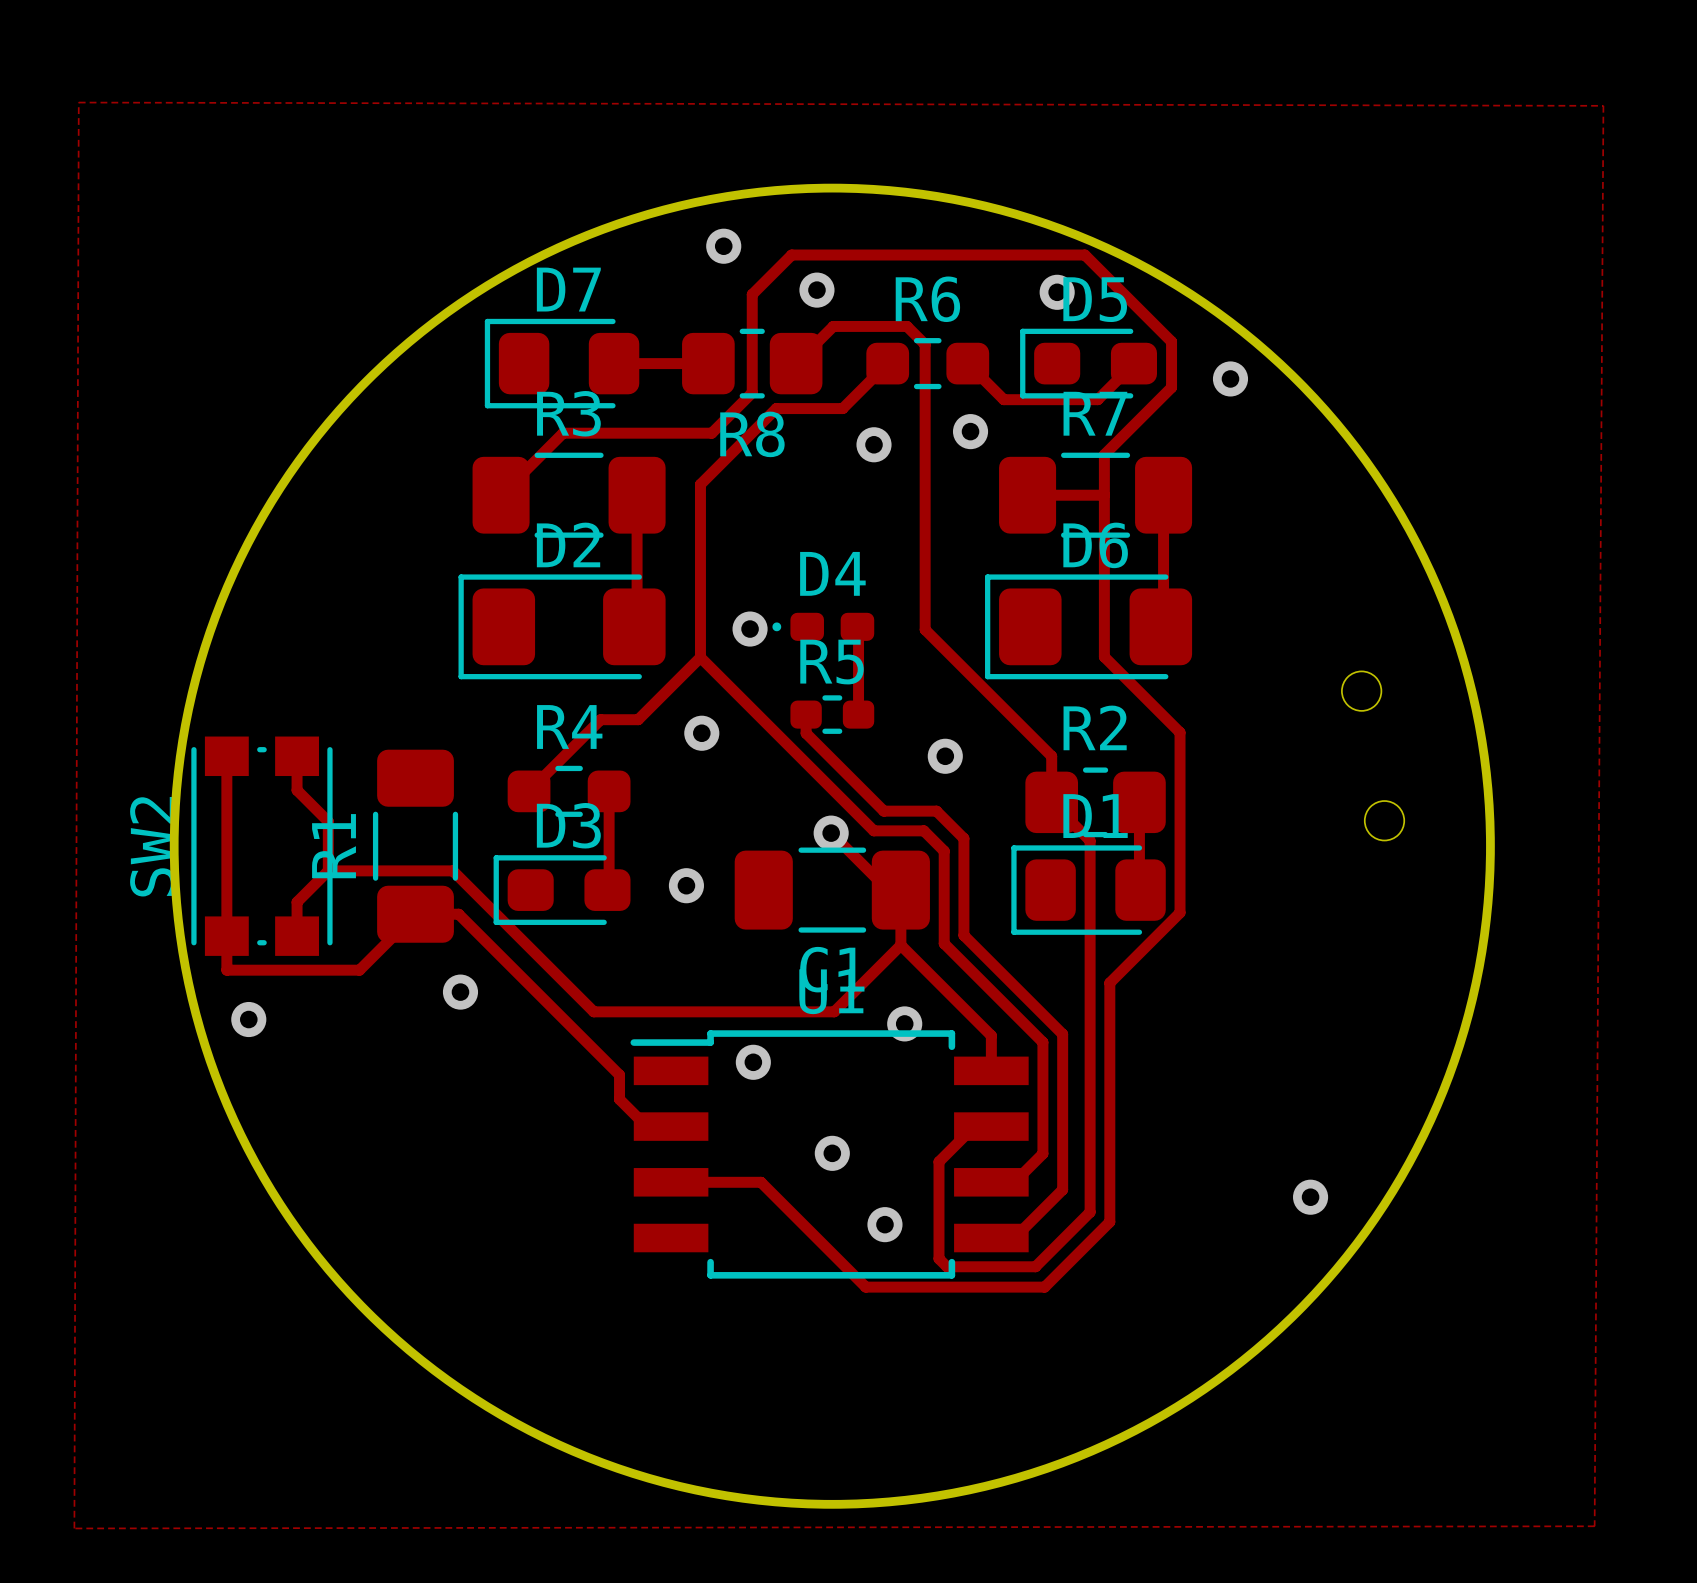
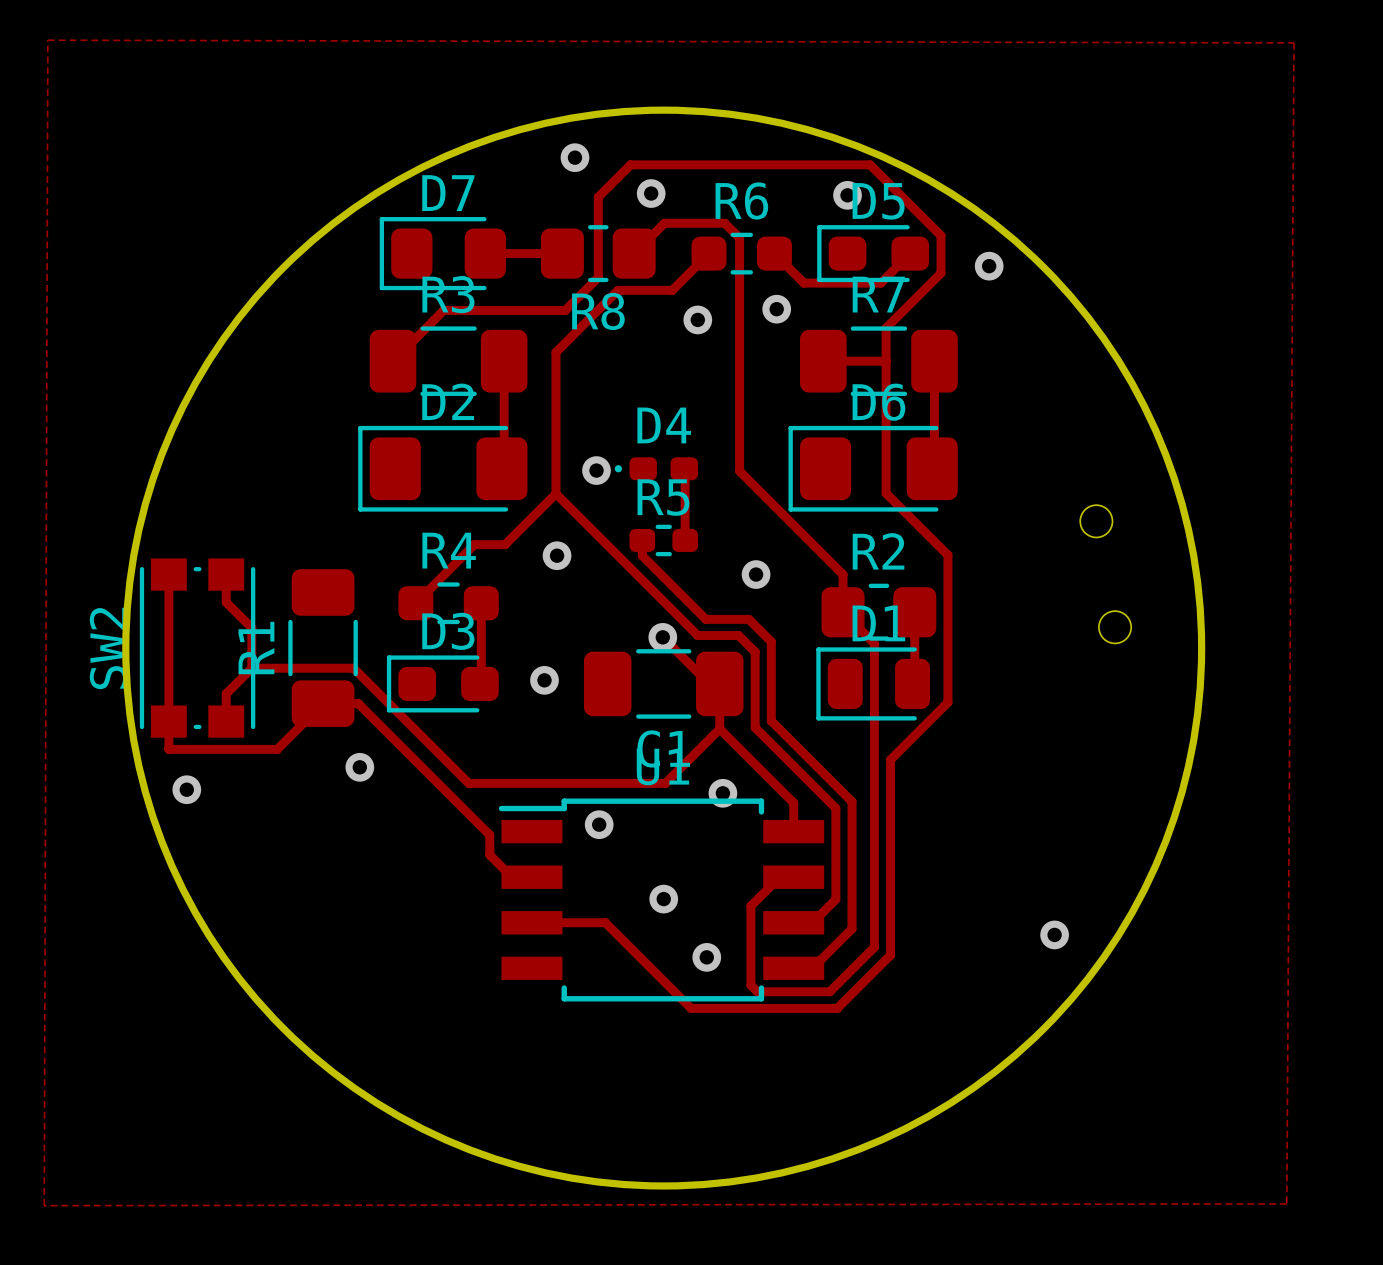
D1 footprint: [1011, 845, 1166, 935] -> [816, 647, 931, 721]

